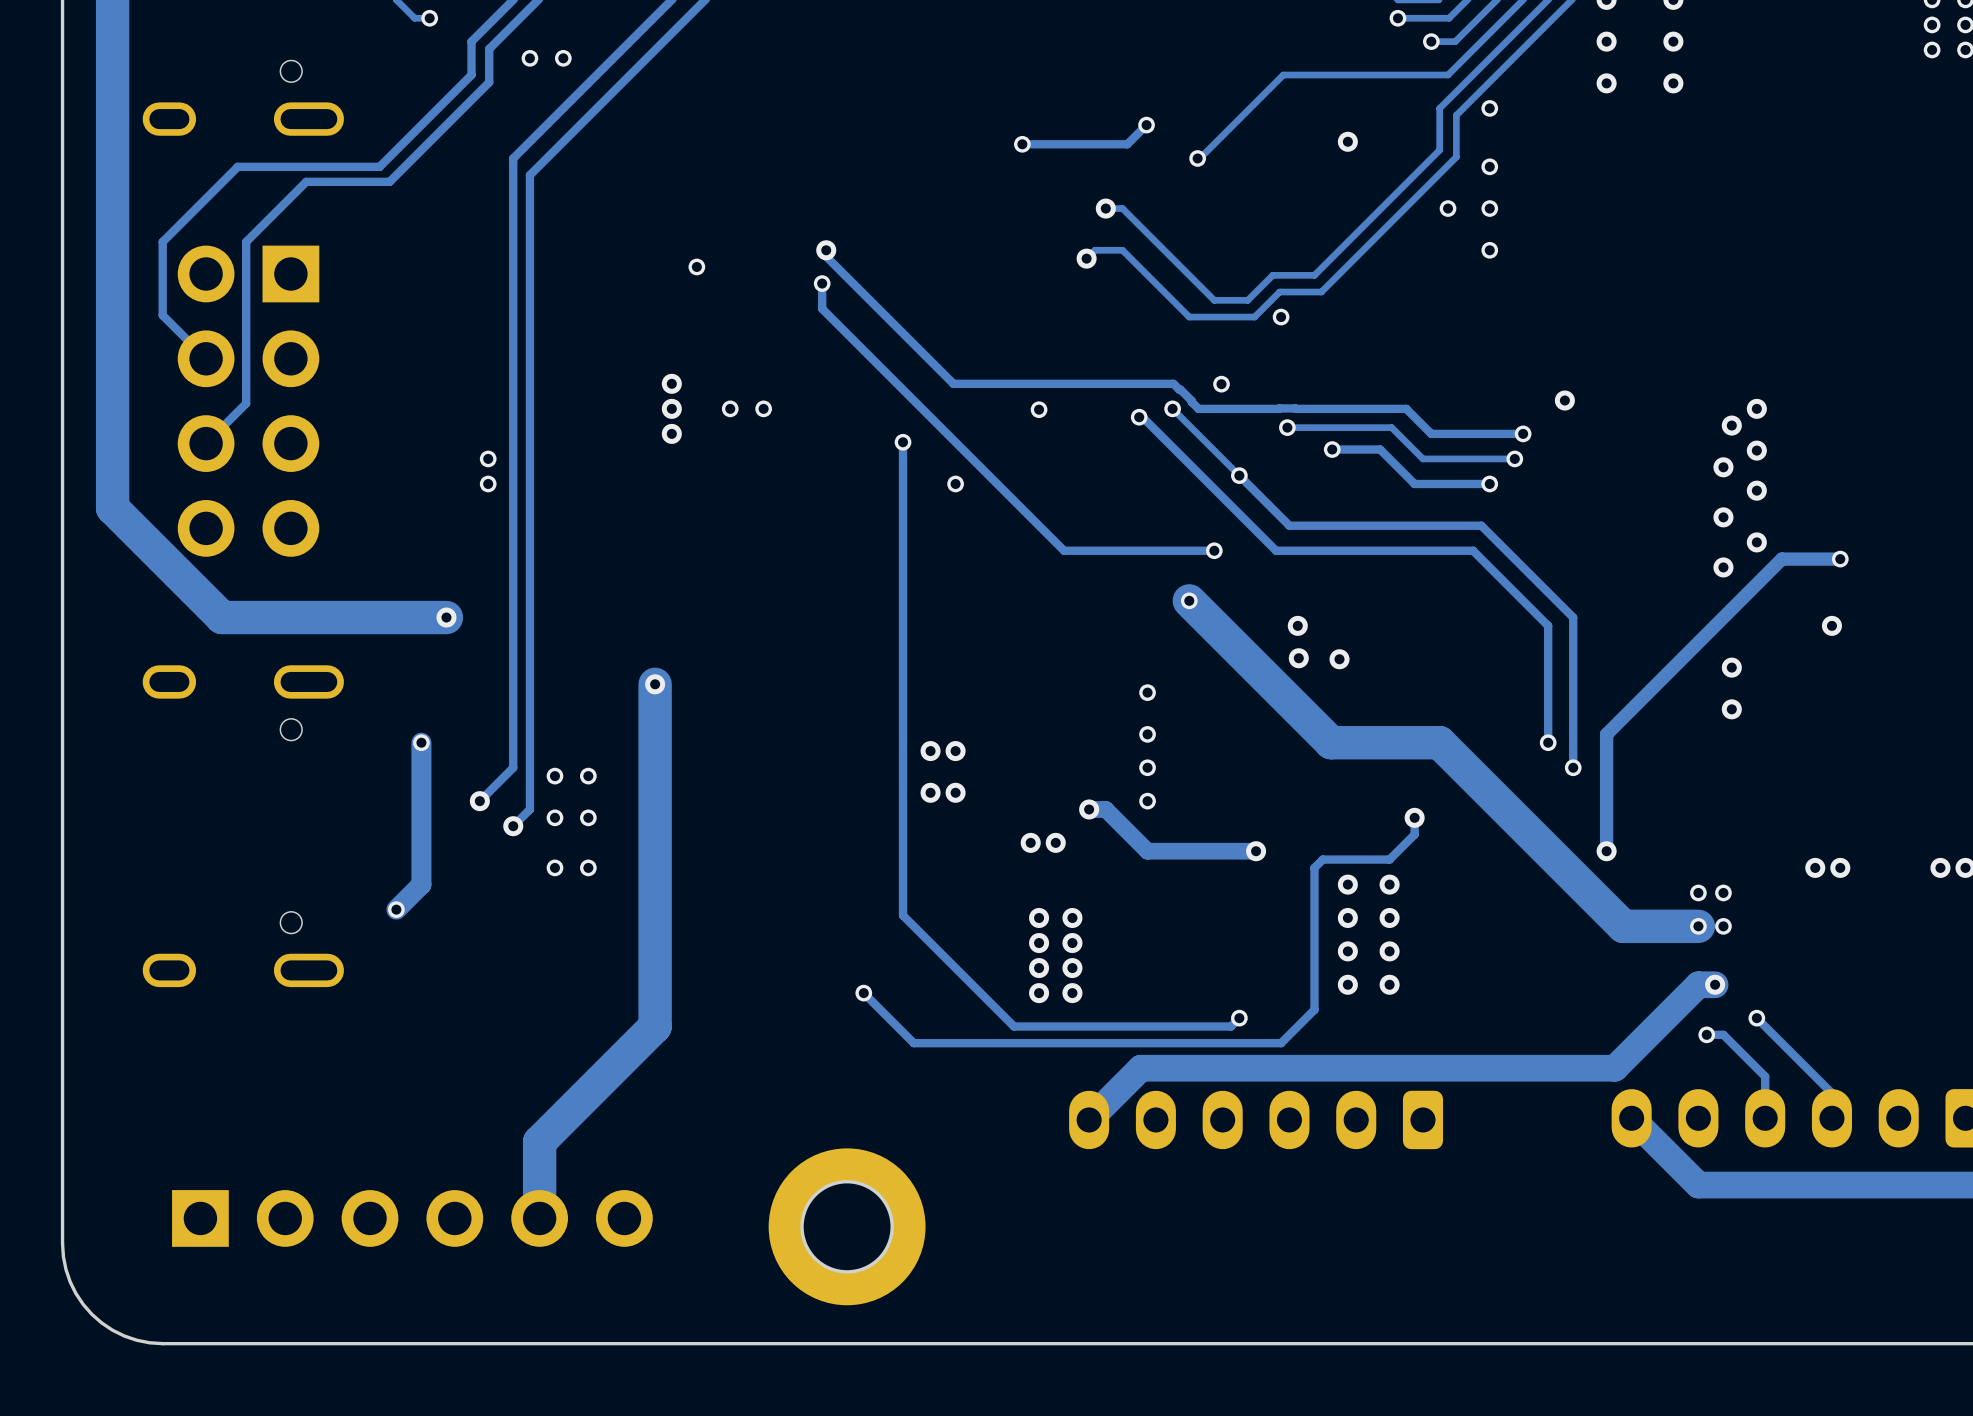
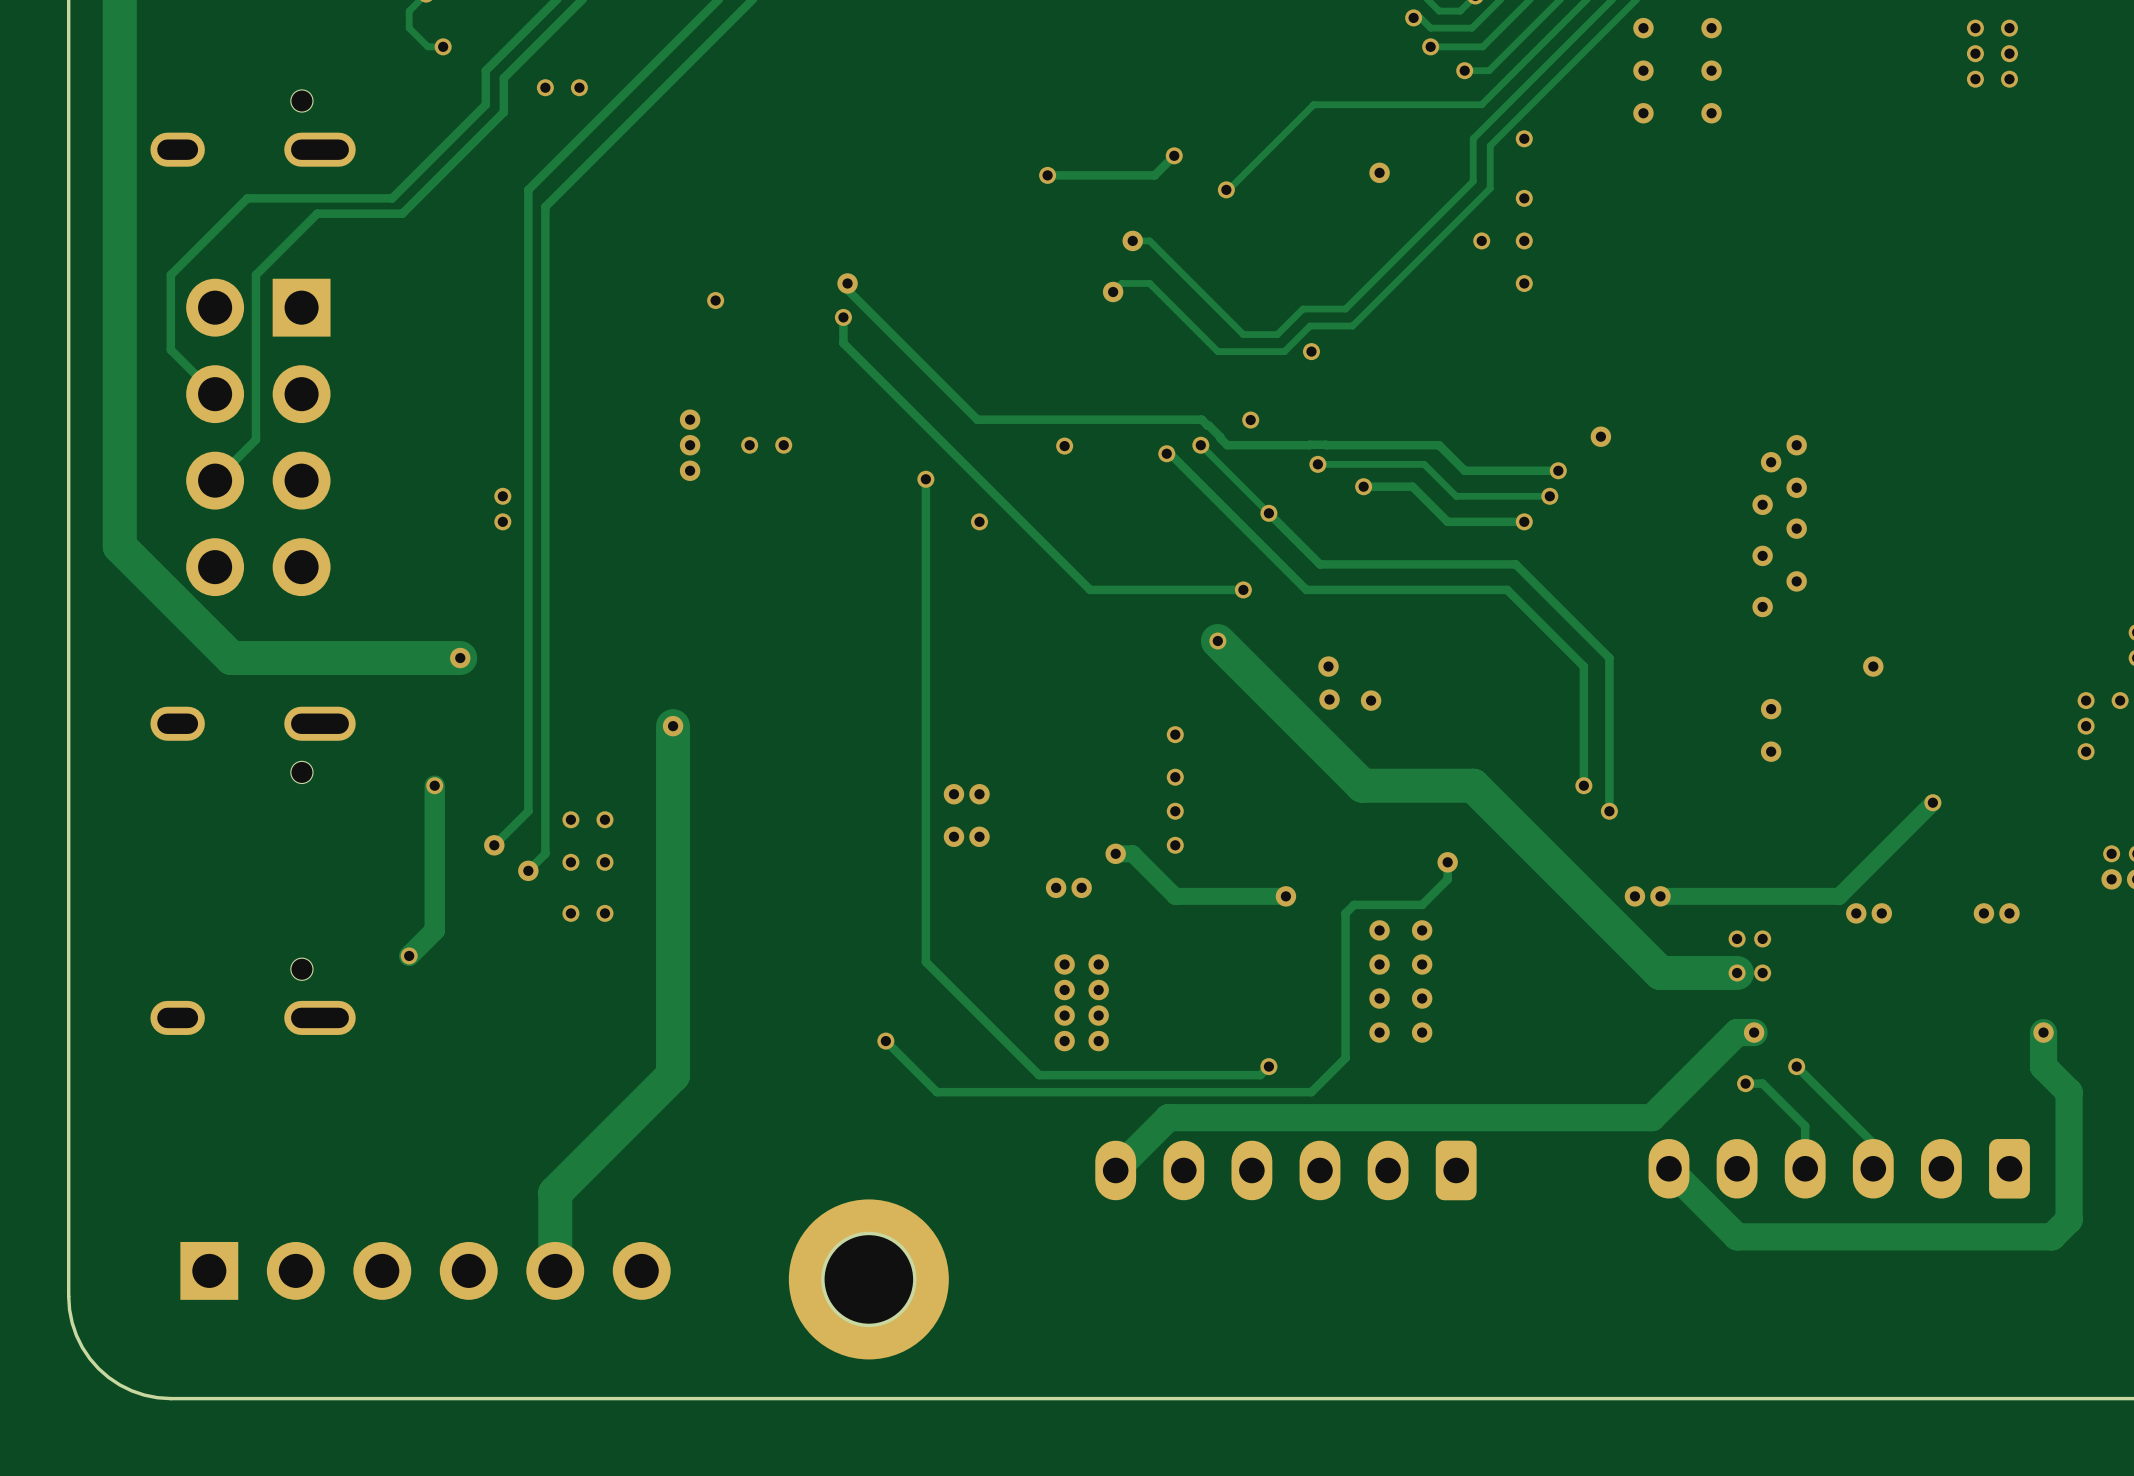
track: (1840, 559) (1781, 559) (1606, 734) (1606, 851) -> none
via: (1840, 559) -> none
track: none -> (1932, 802) (1839, 896) (1660, 896)
via: none -> (1932, 802)
via: none -> (1634, 896)
via: (1606, 851) -> none
via: none -> (1660, 896)

